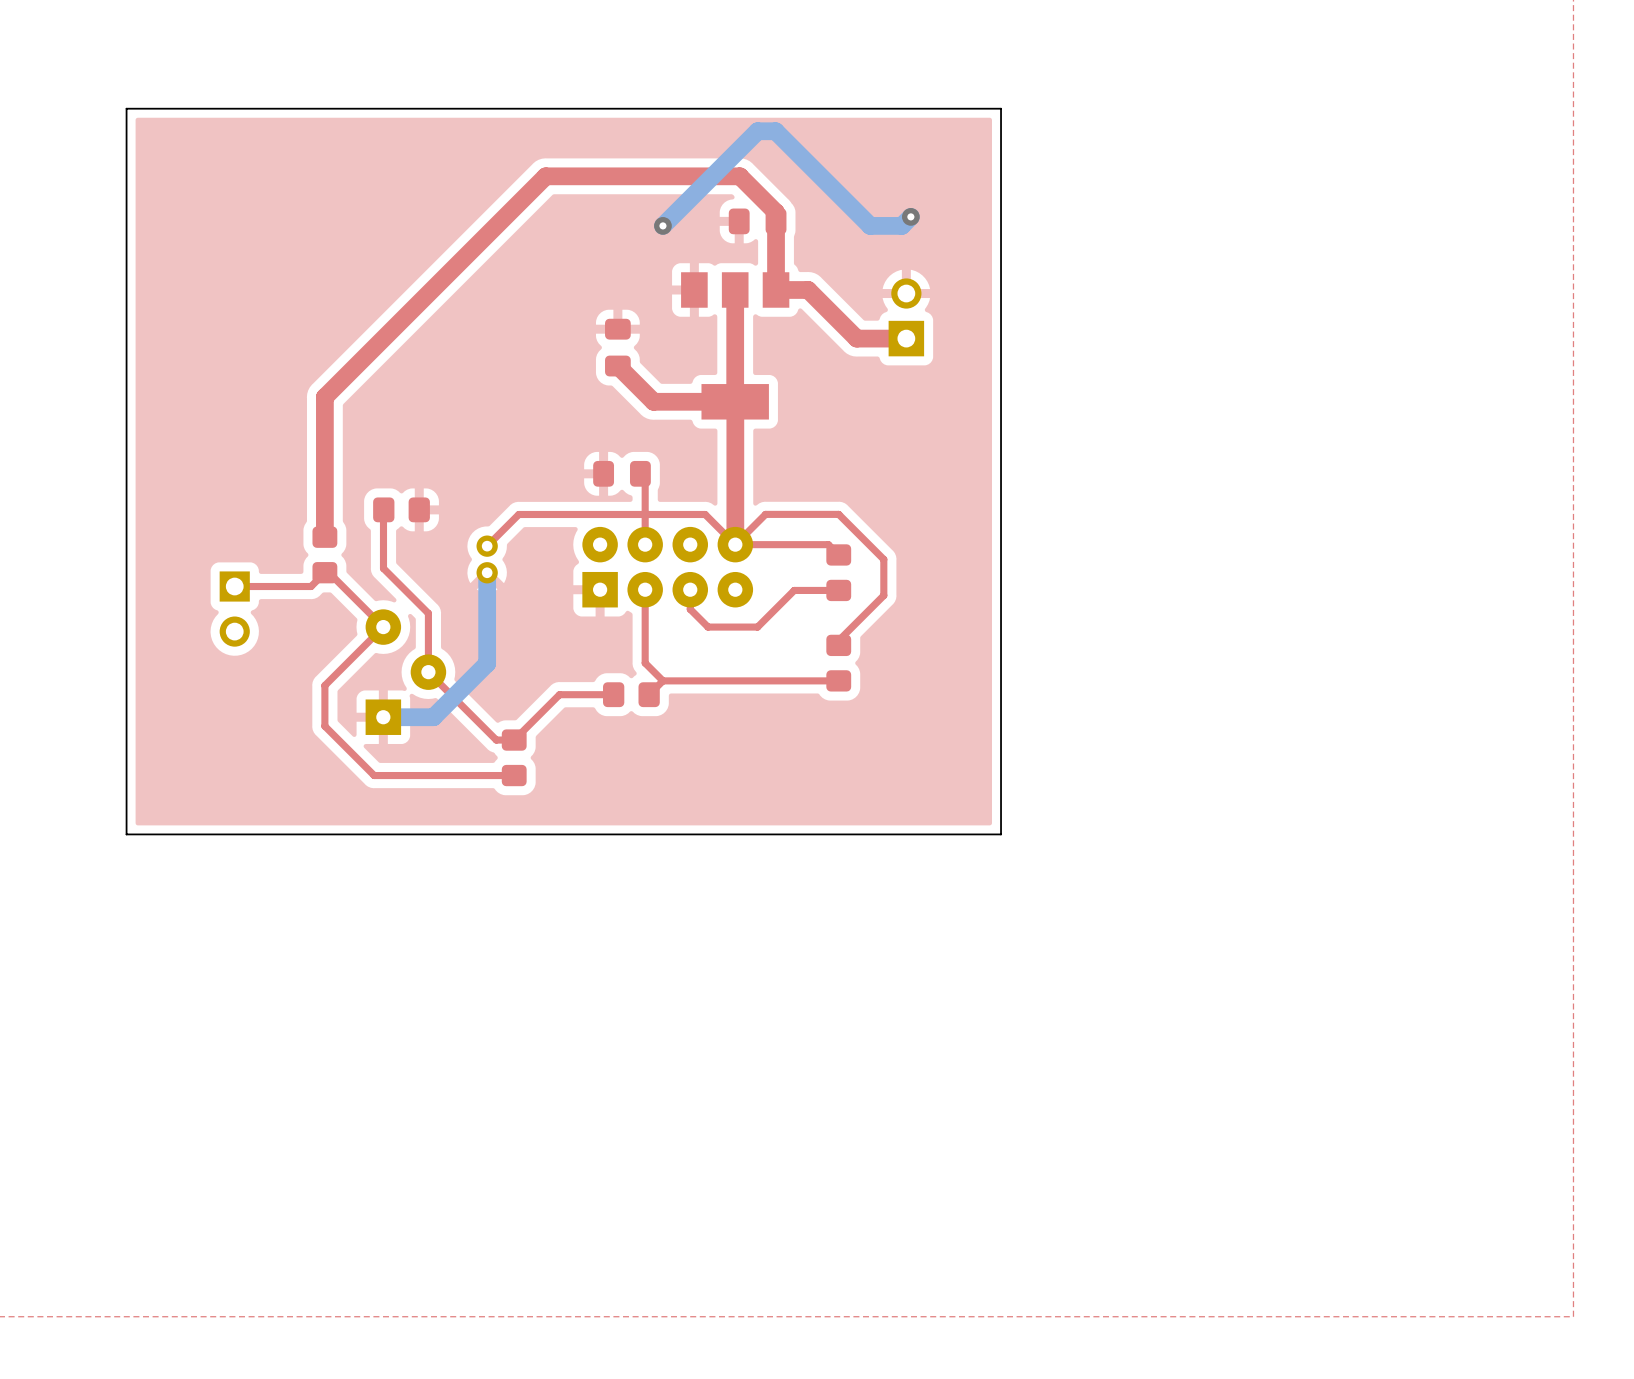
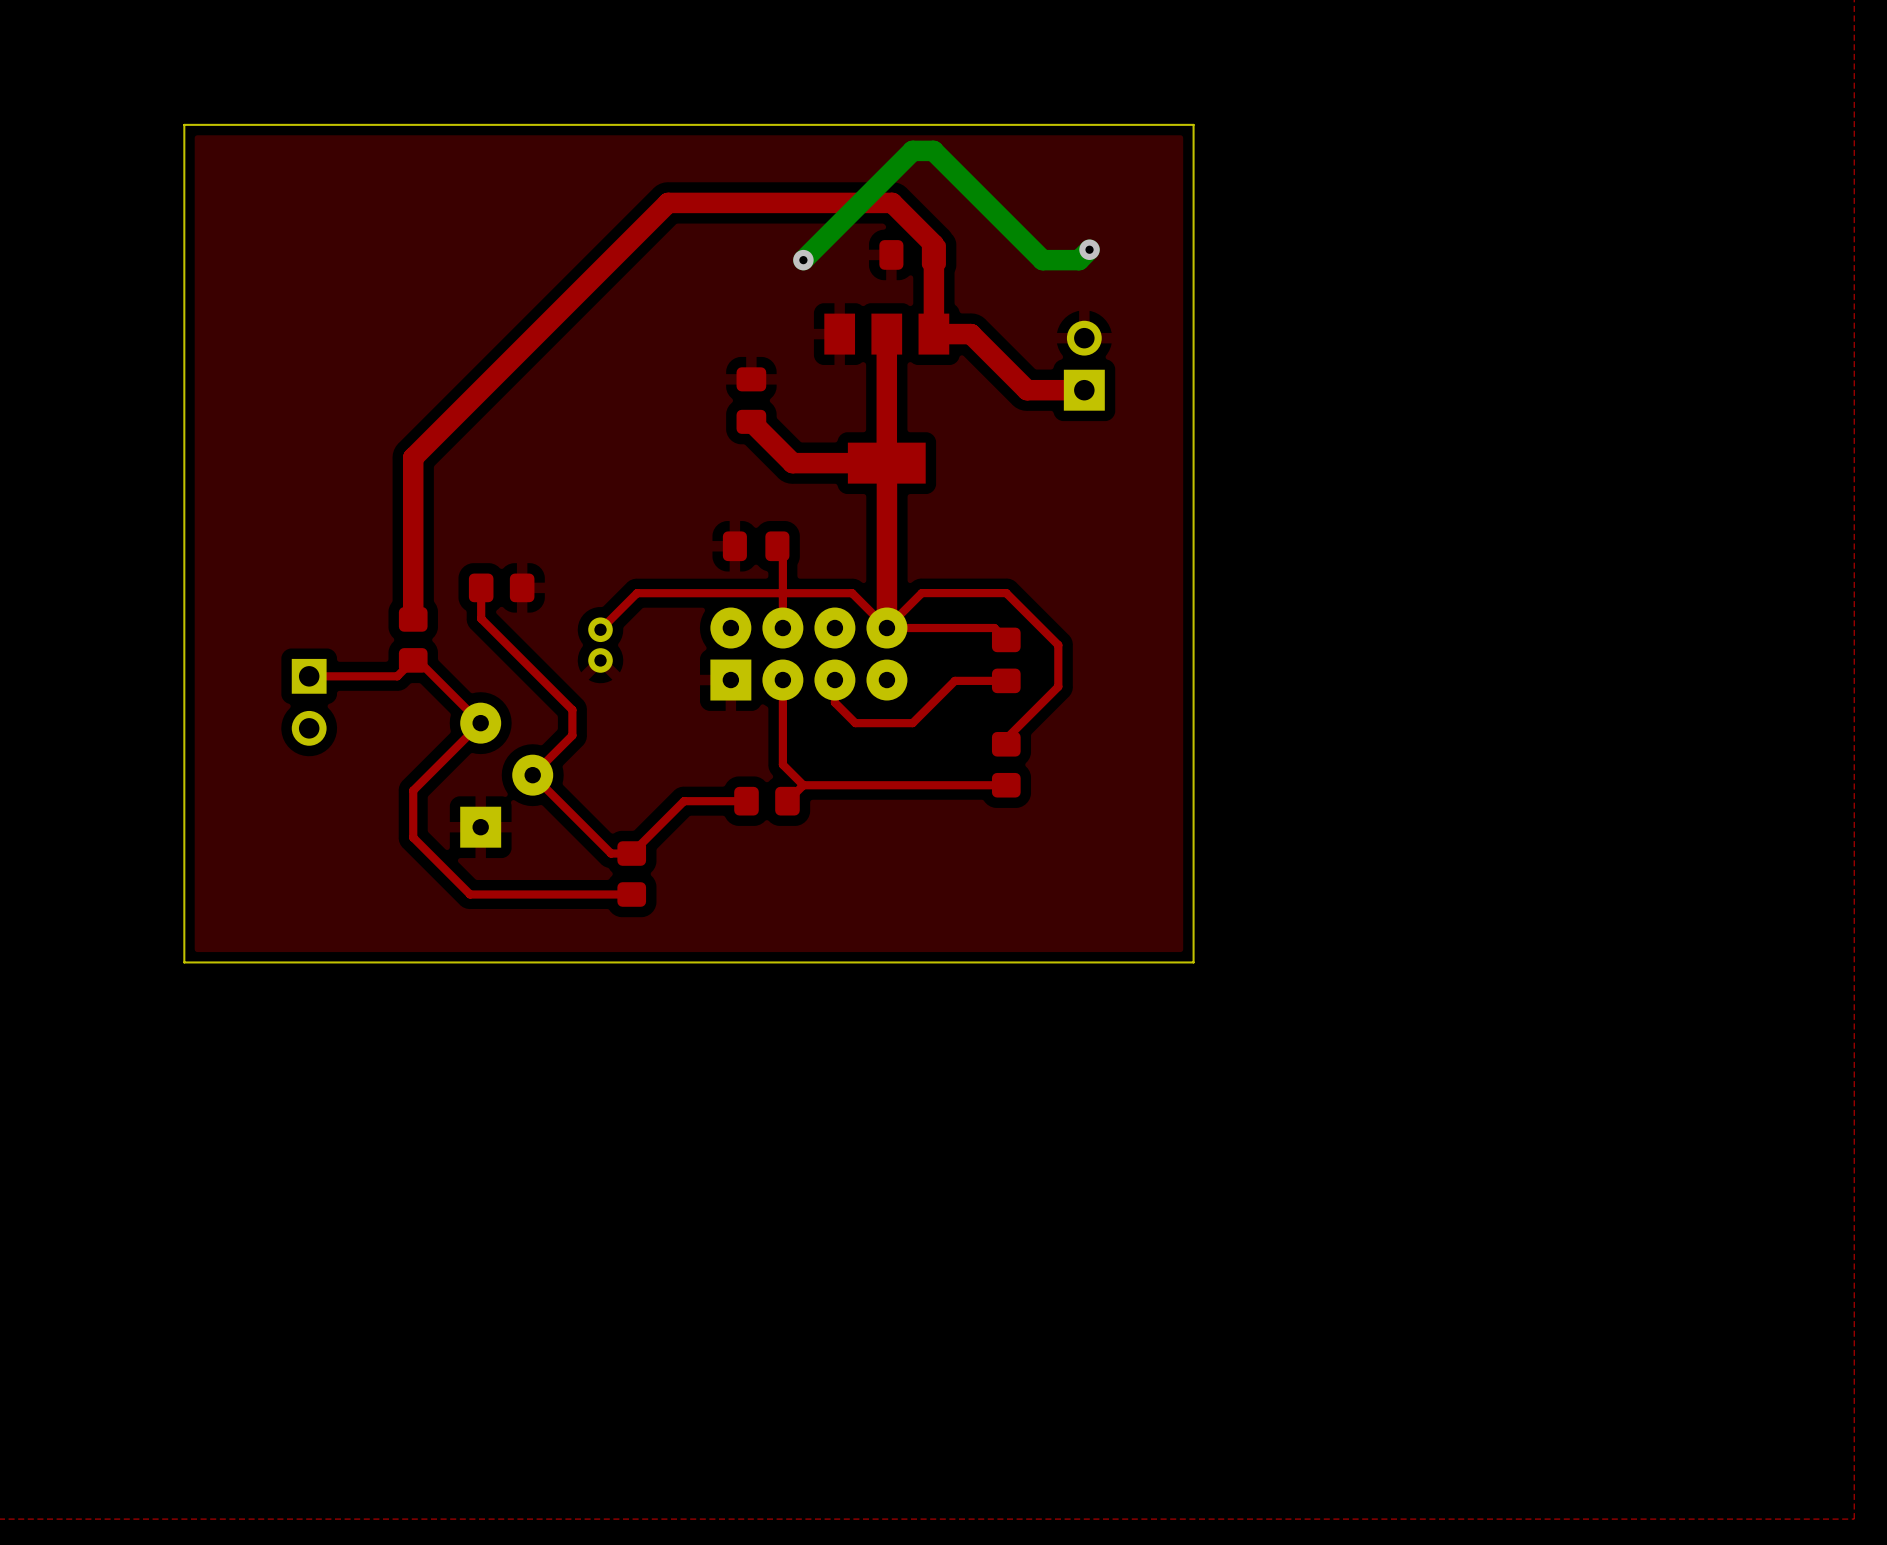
top track: (383, 510) (383, 568) (428, 613) (428, 672) -> (481, 587) (481, 618) (572, 709) (572, 735) (532, 775)
bottom track: (487, 574) (487, 663) (433, 717) (383, 717) -> none

